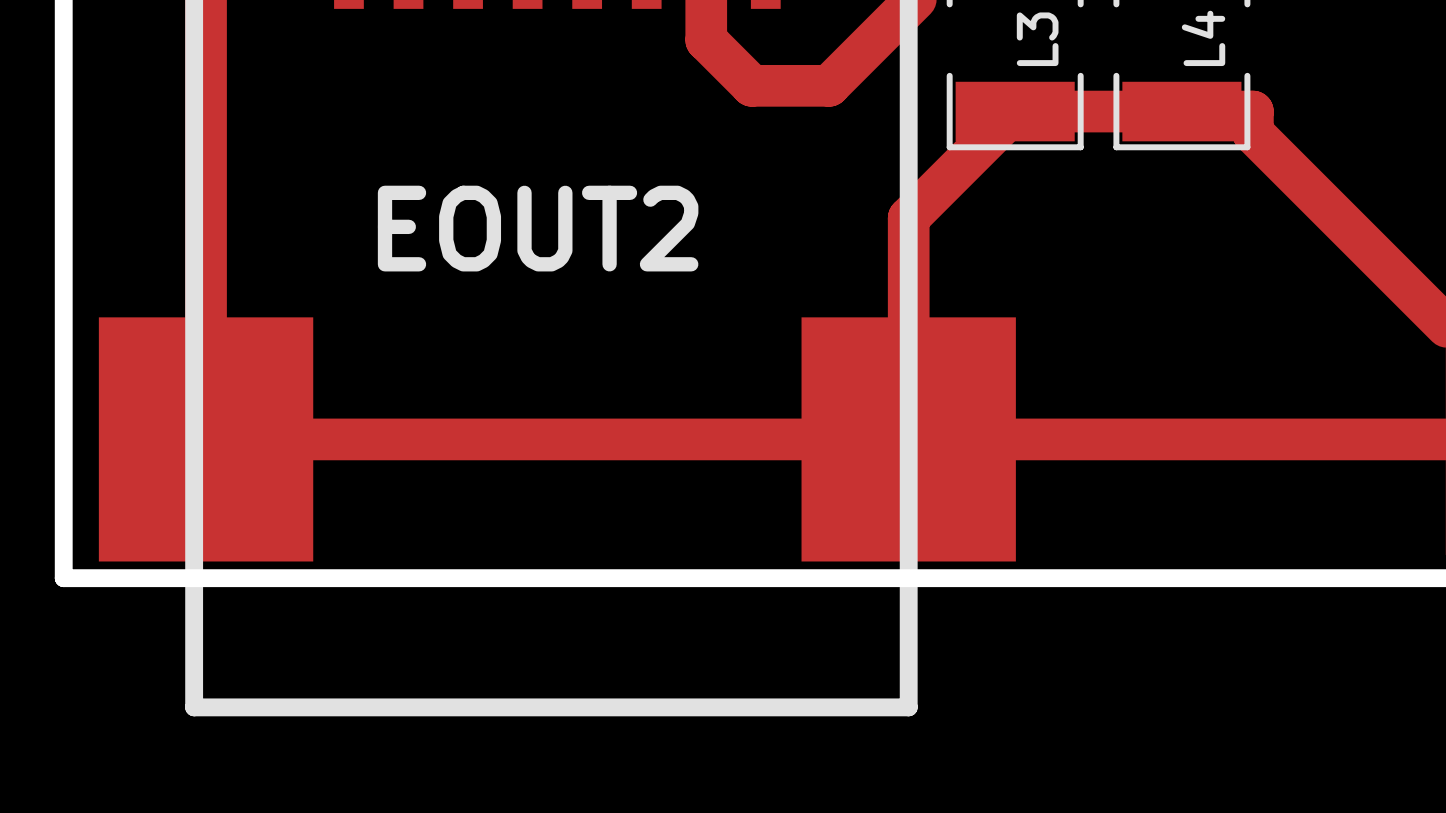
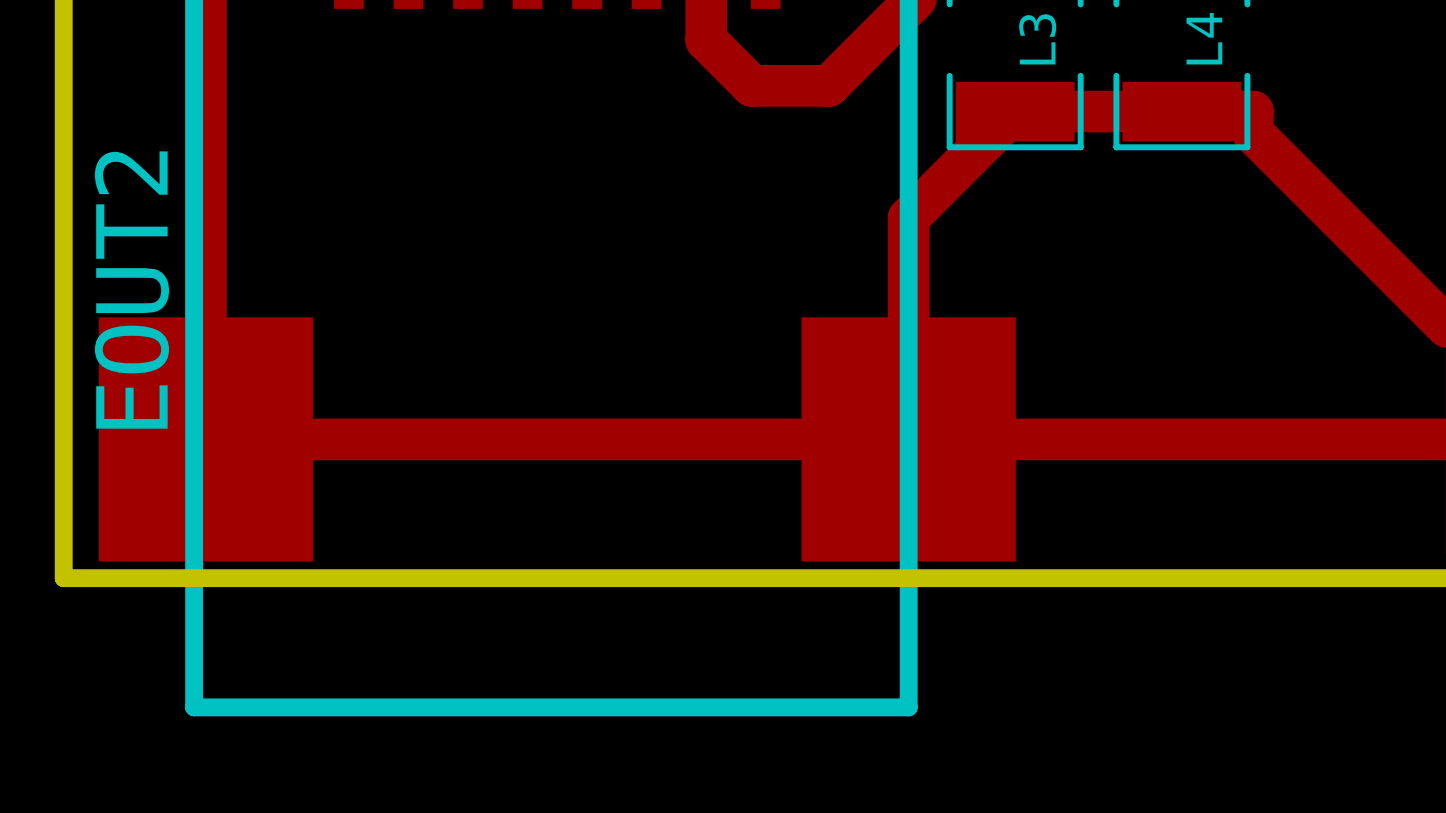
EOUT2 name rotation: 0° (538, 228) -> 90° counterclockwise (131, 290)
EOUT2 name position: EOUT2 (538, 228) -> EOUT2 (131, 290)

